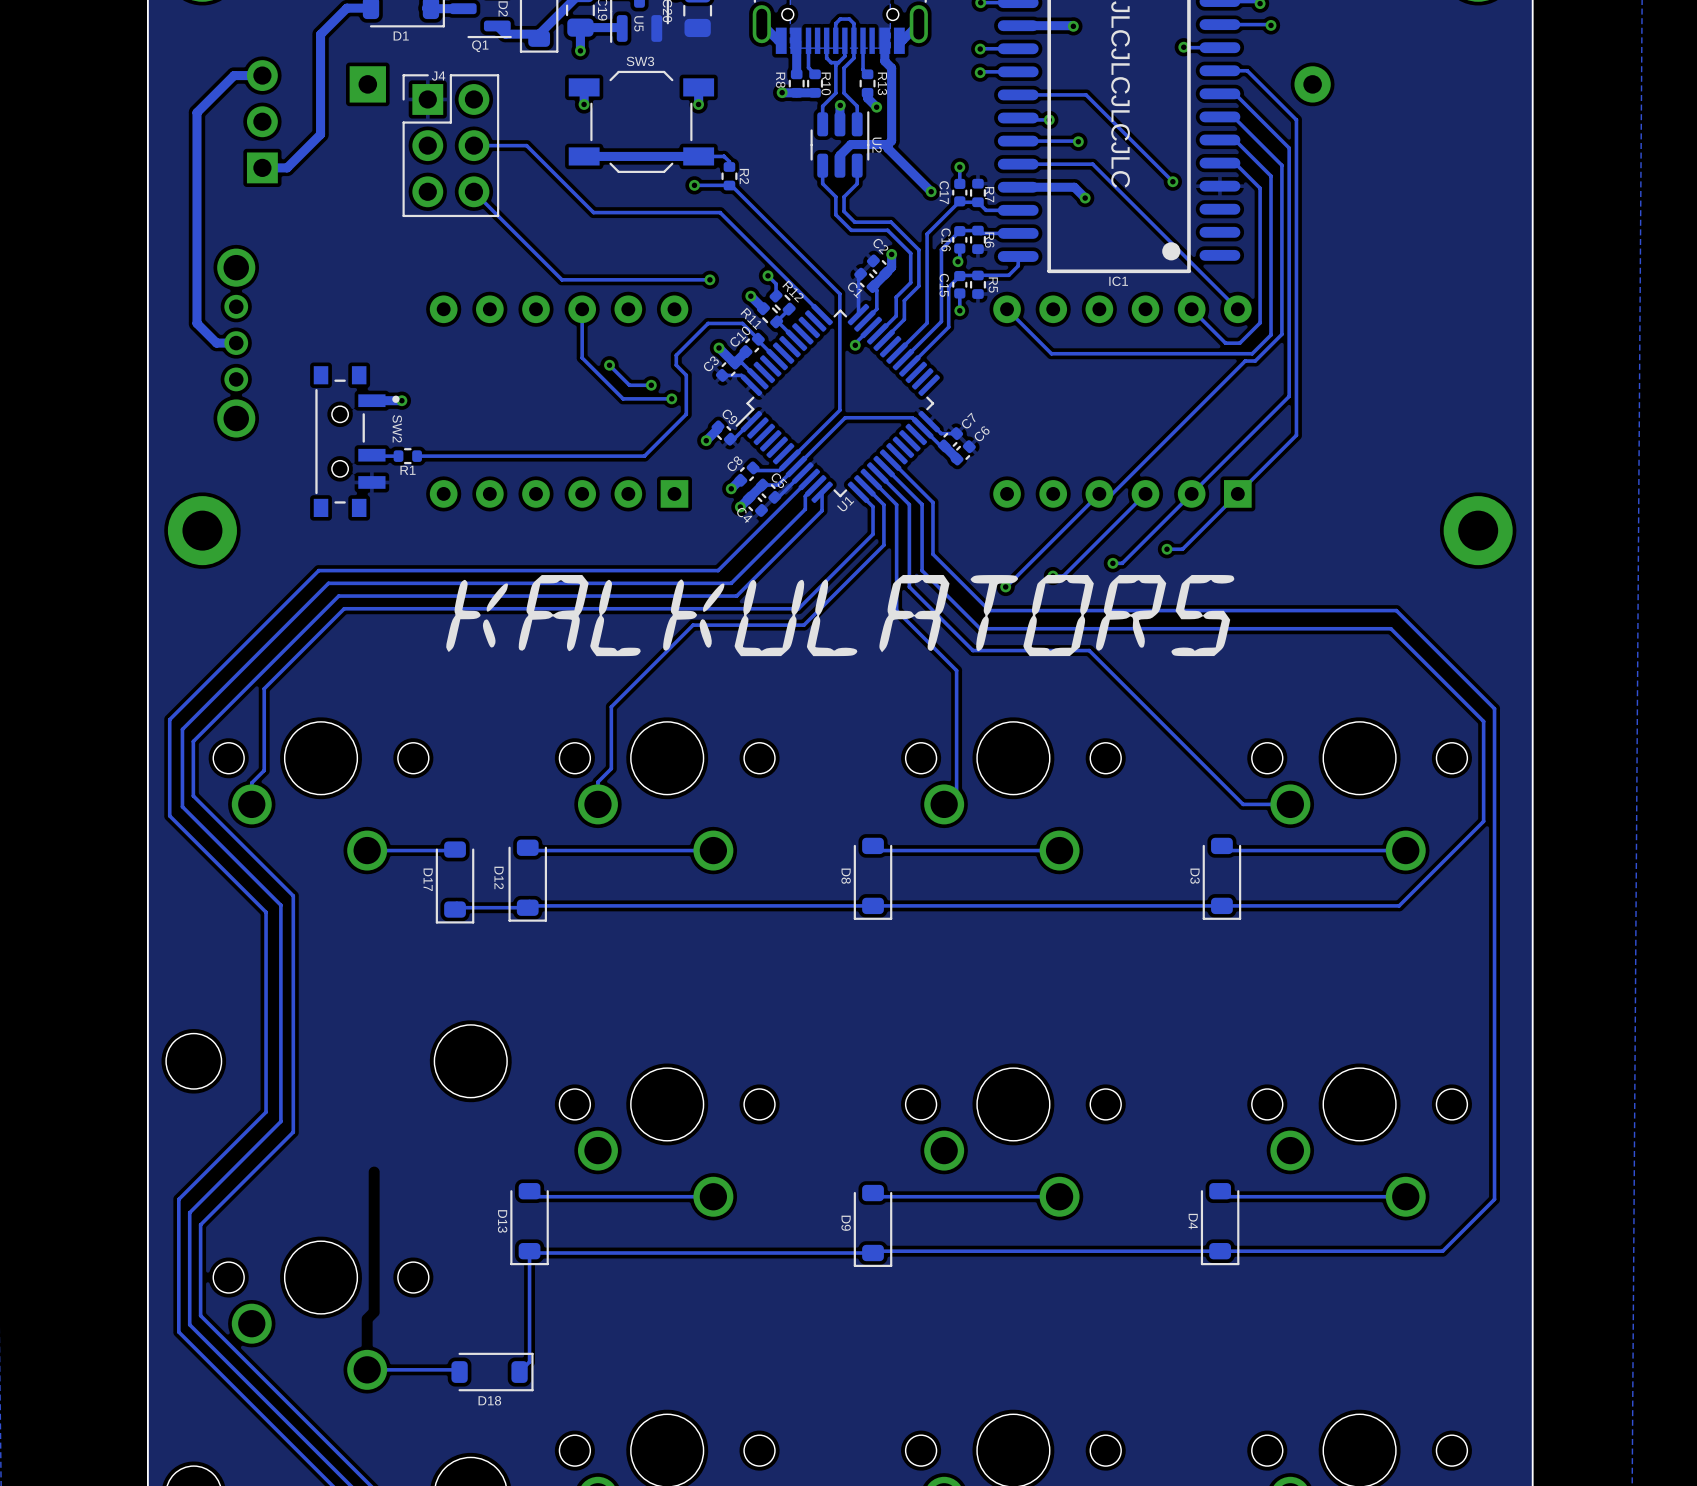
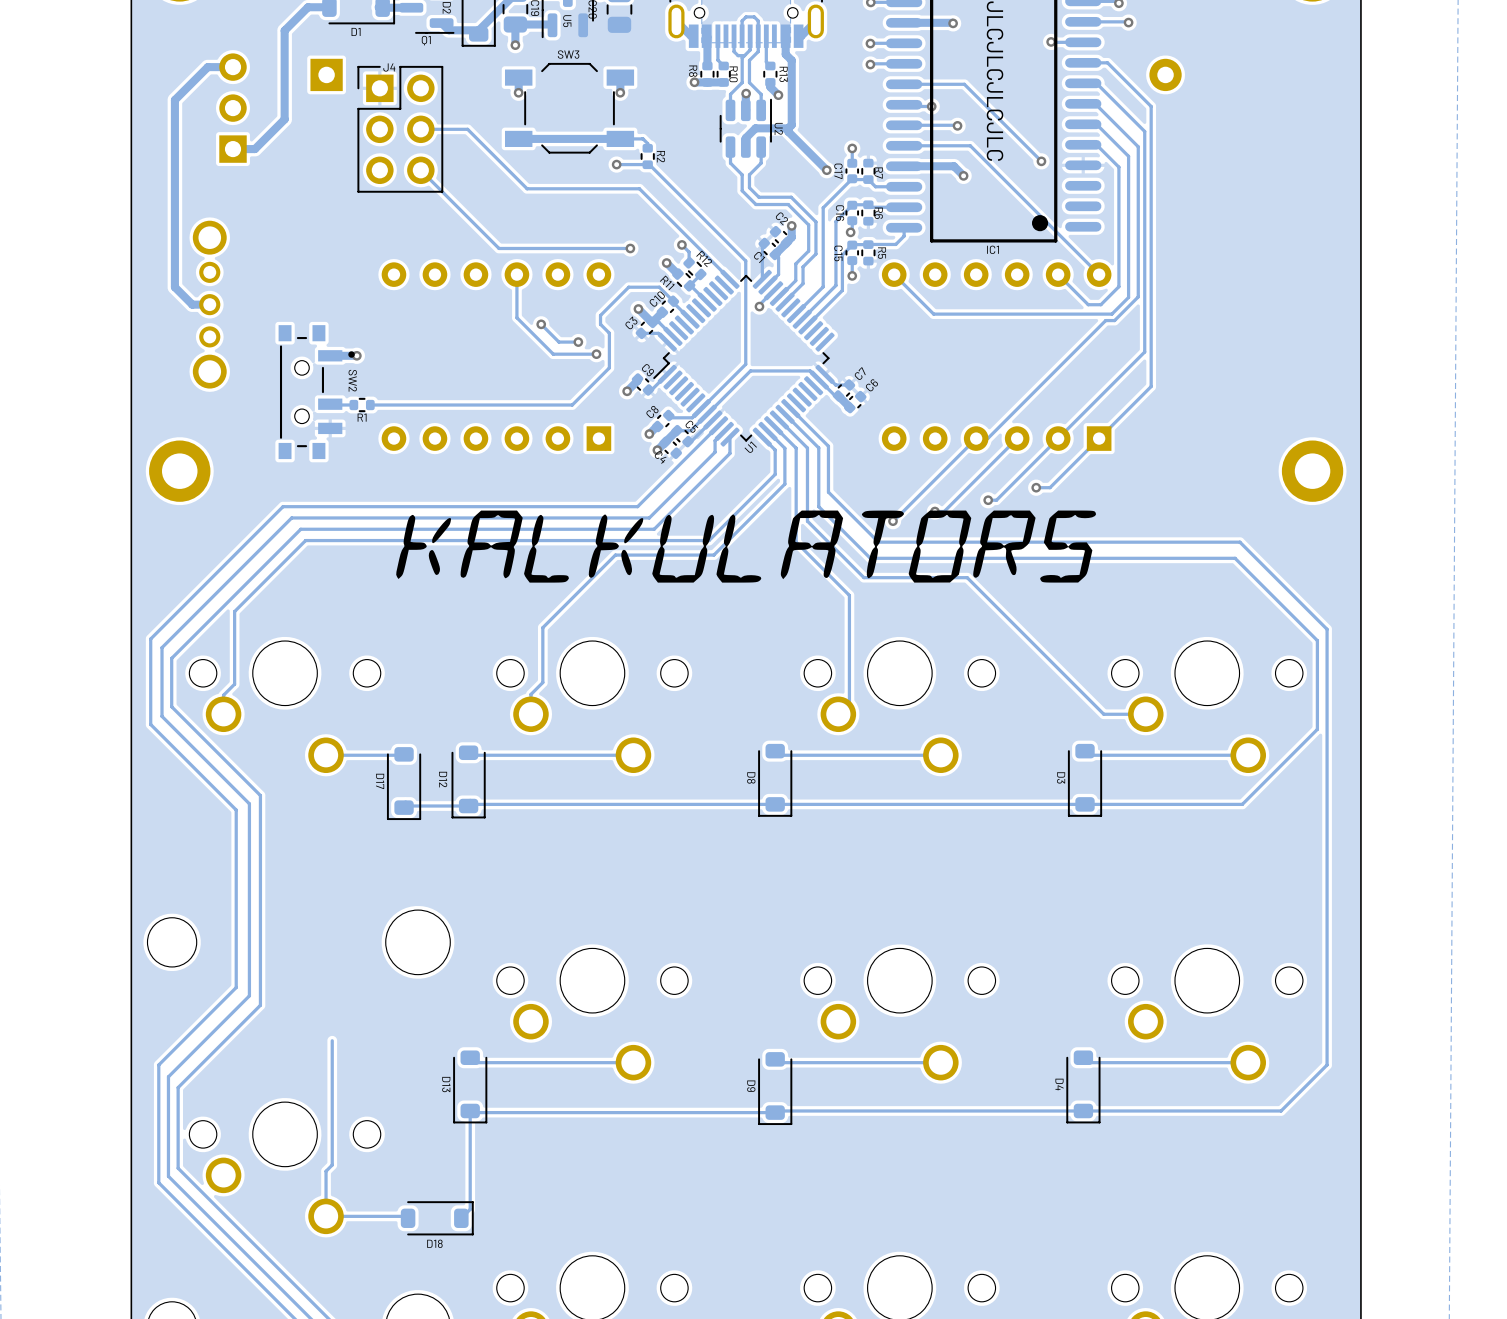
track: none -> (332, 1040) (332, 1165) (326, 1171) (326, 1216)

